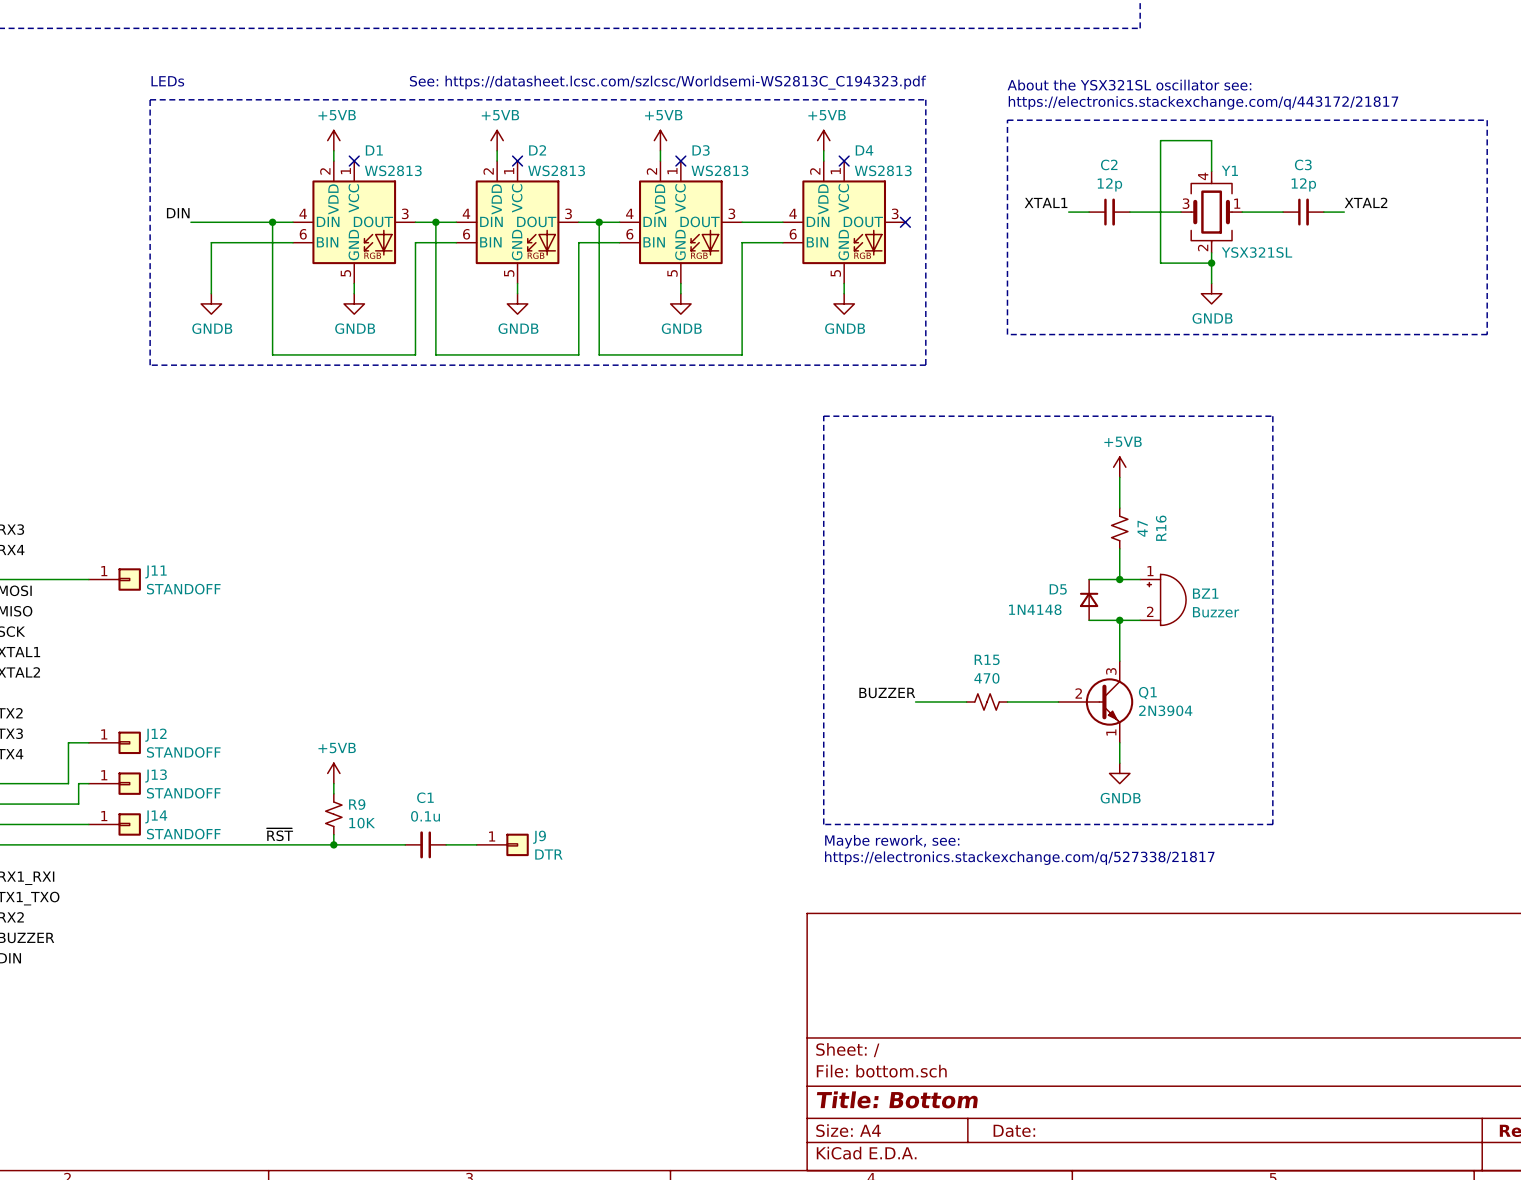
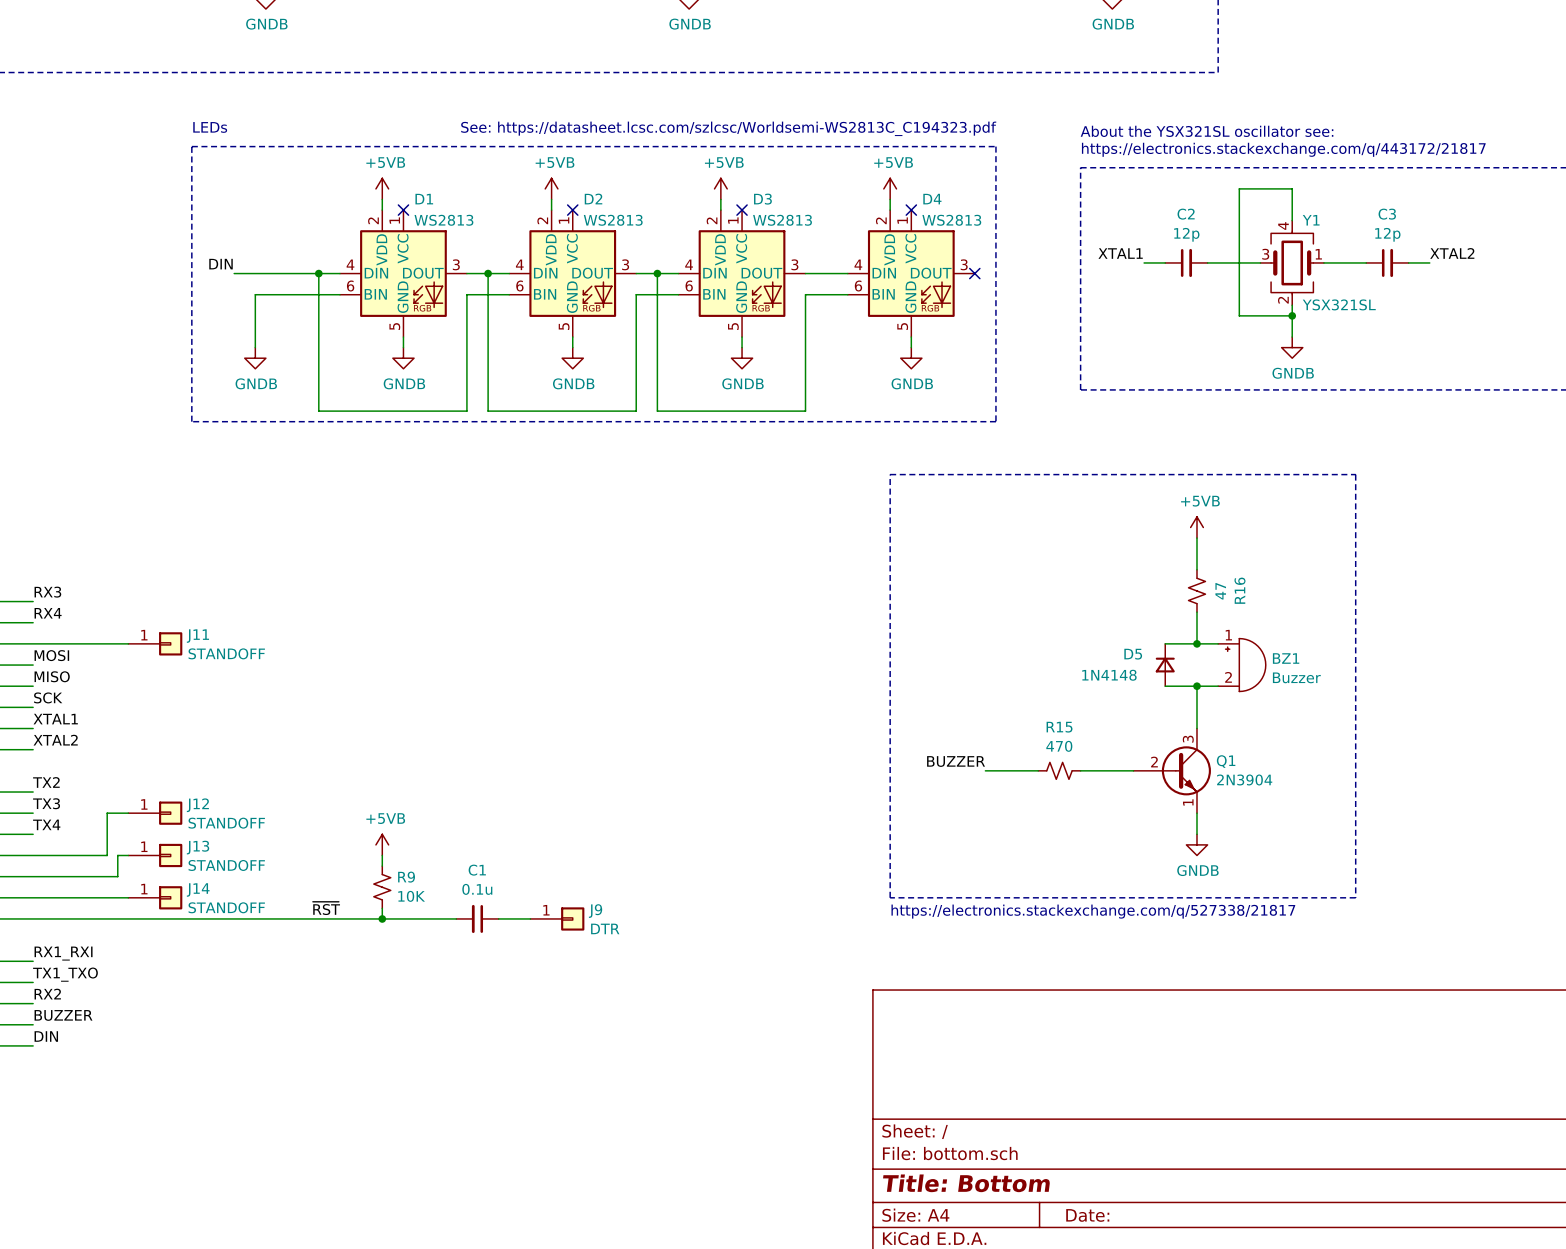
text: Maybe rework, see: (892, 841) -> https://electronics.stackexchange.com/q/527338/21817 (1093, 911)
text: https://electronics.stackexchange.com/q/527338/21817 (1019, 858) -> none

